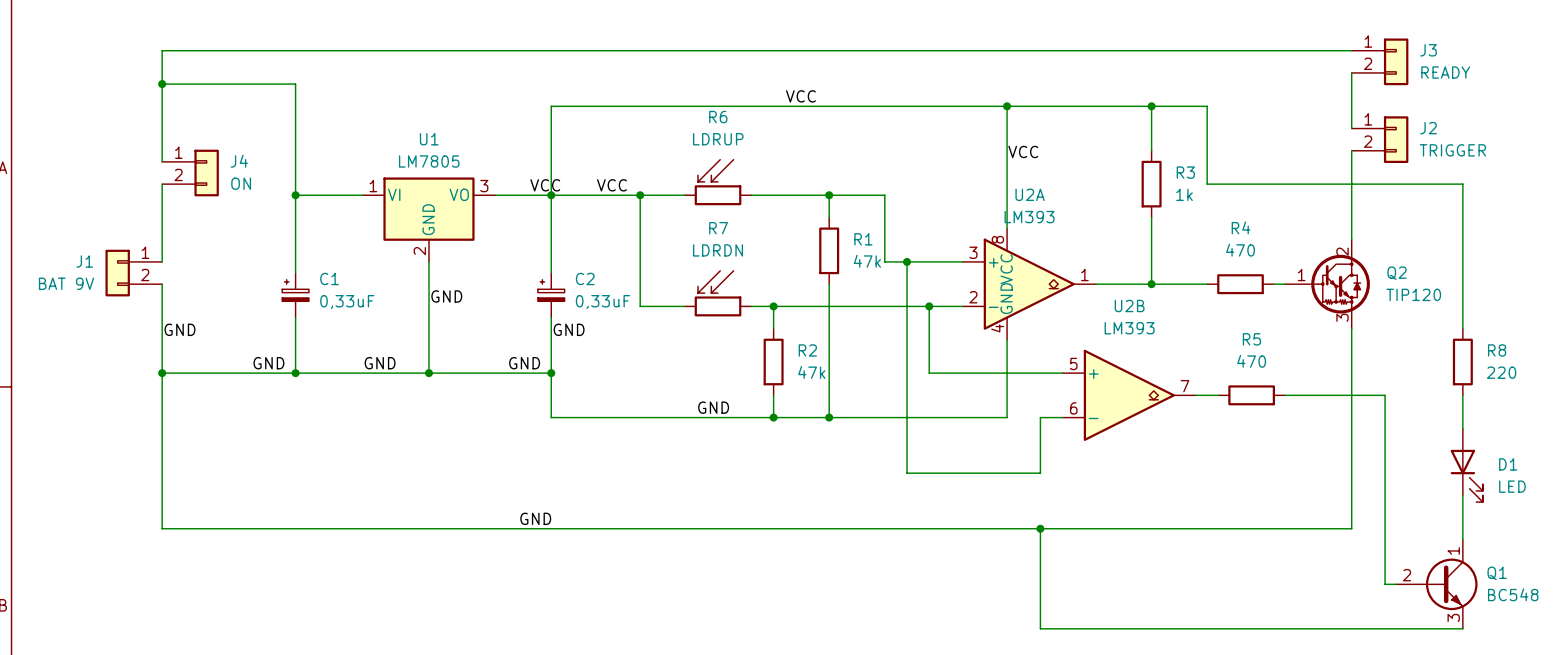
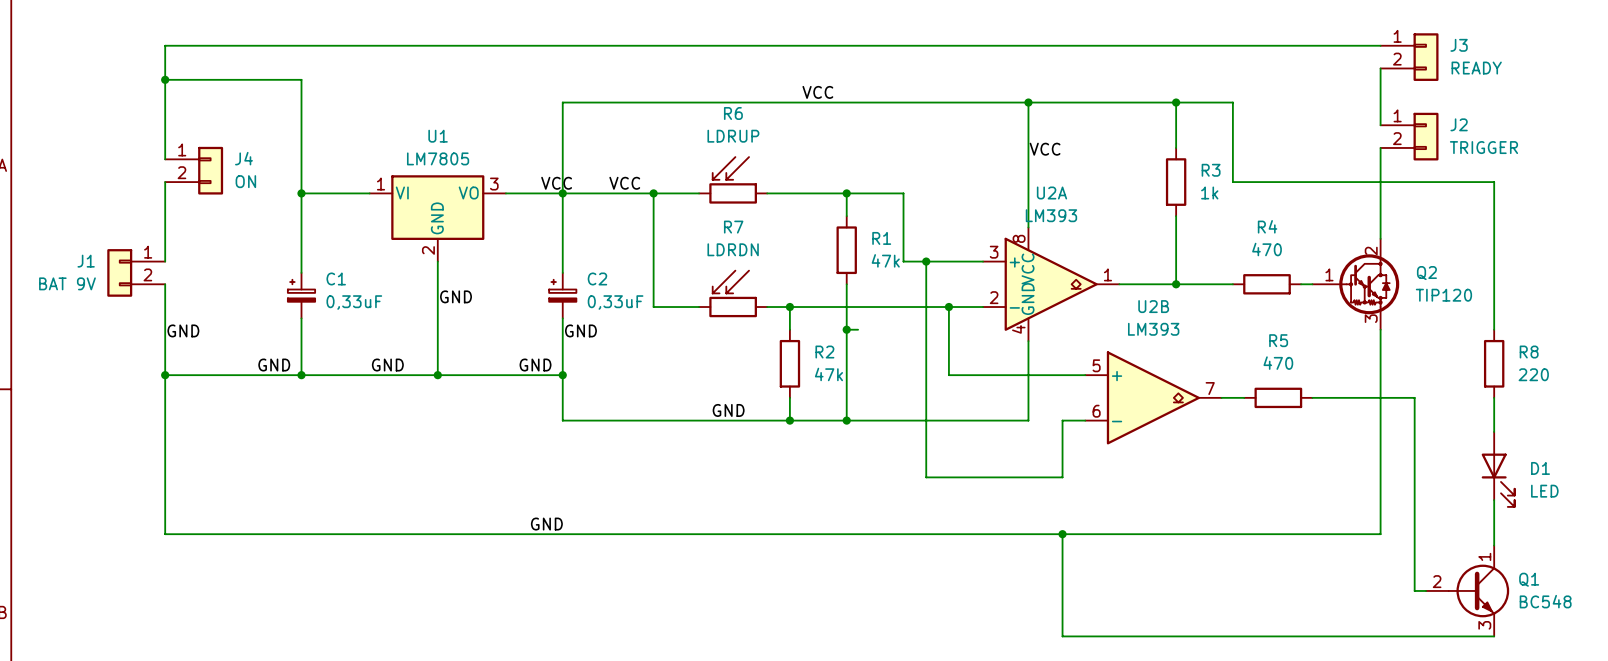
wire: none -> (846, 329) (858, 329)
junction: none -> (846, 329)

